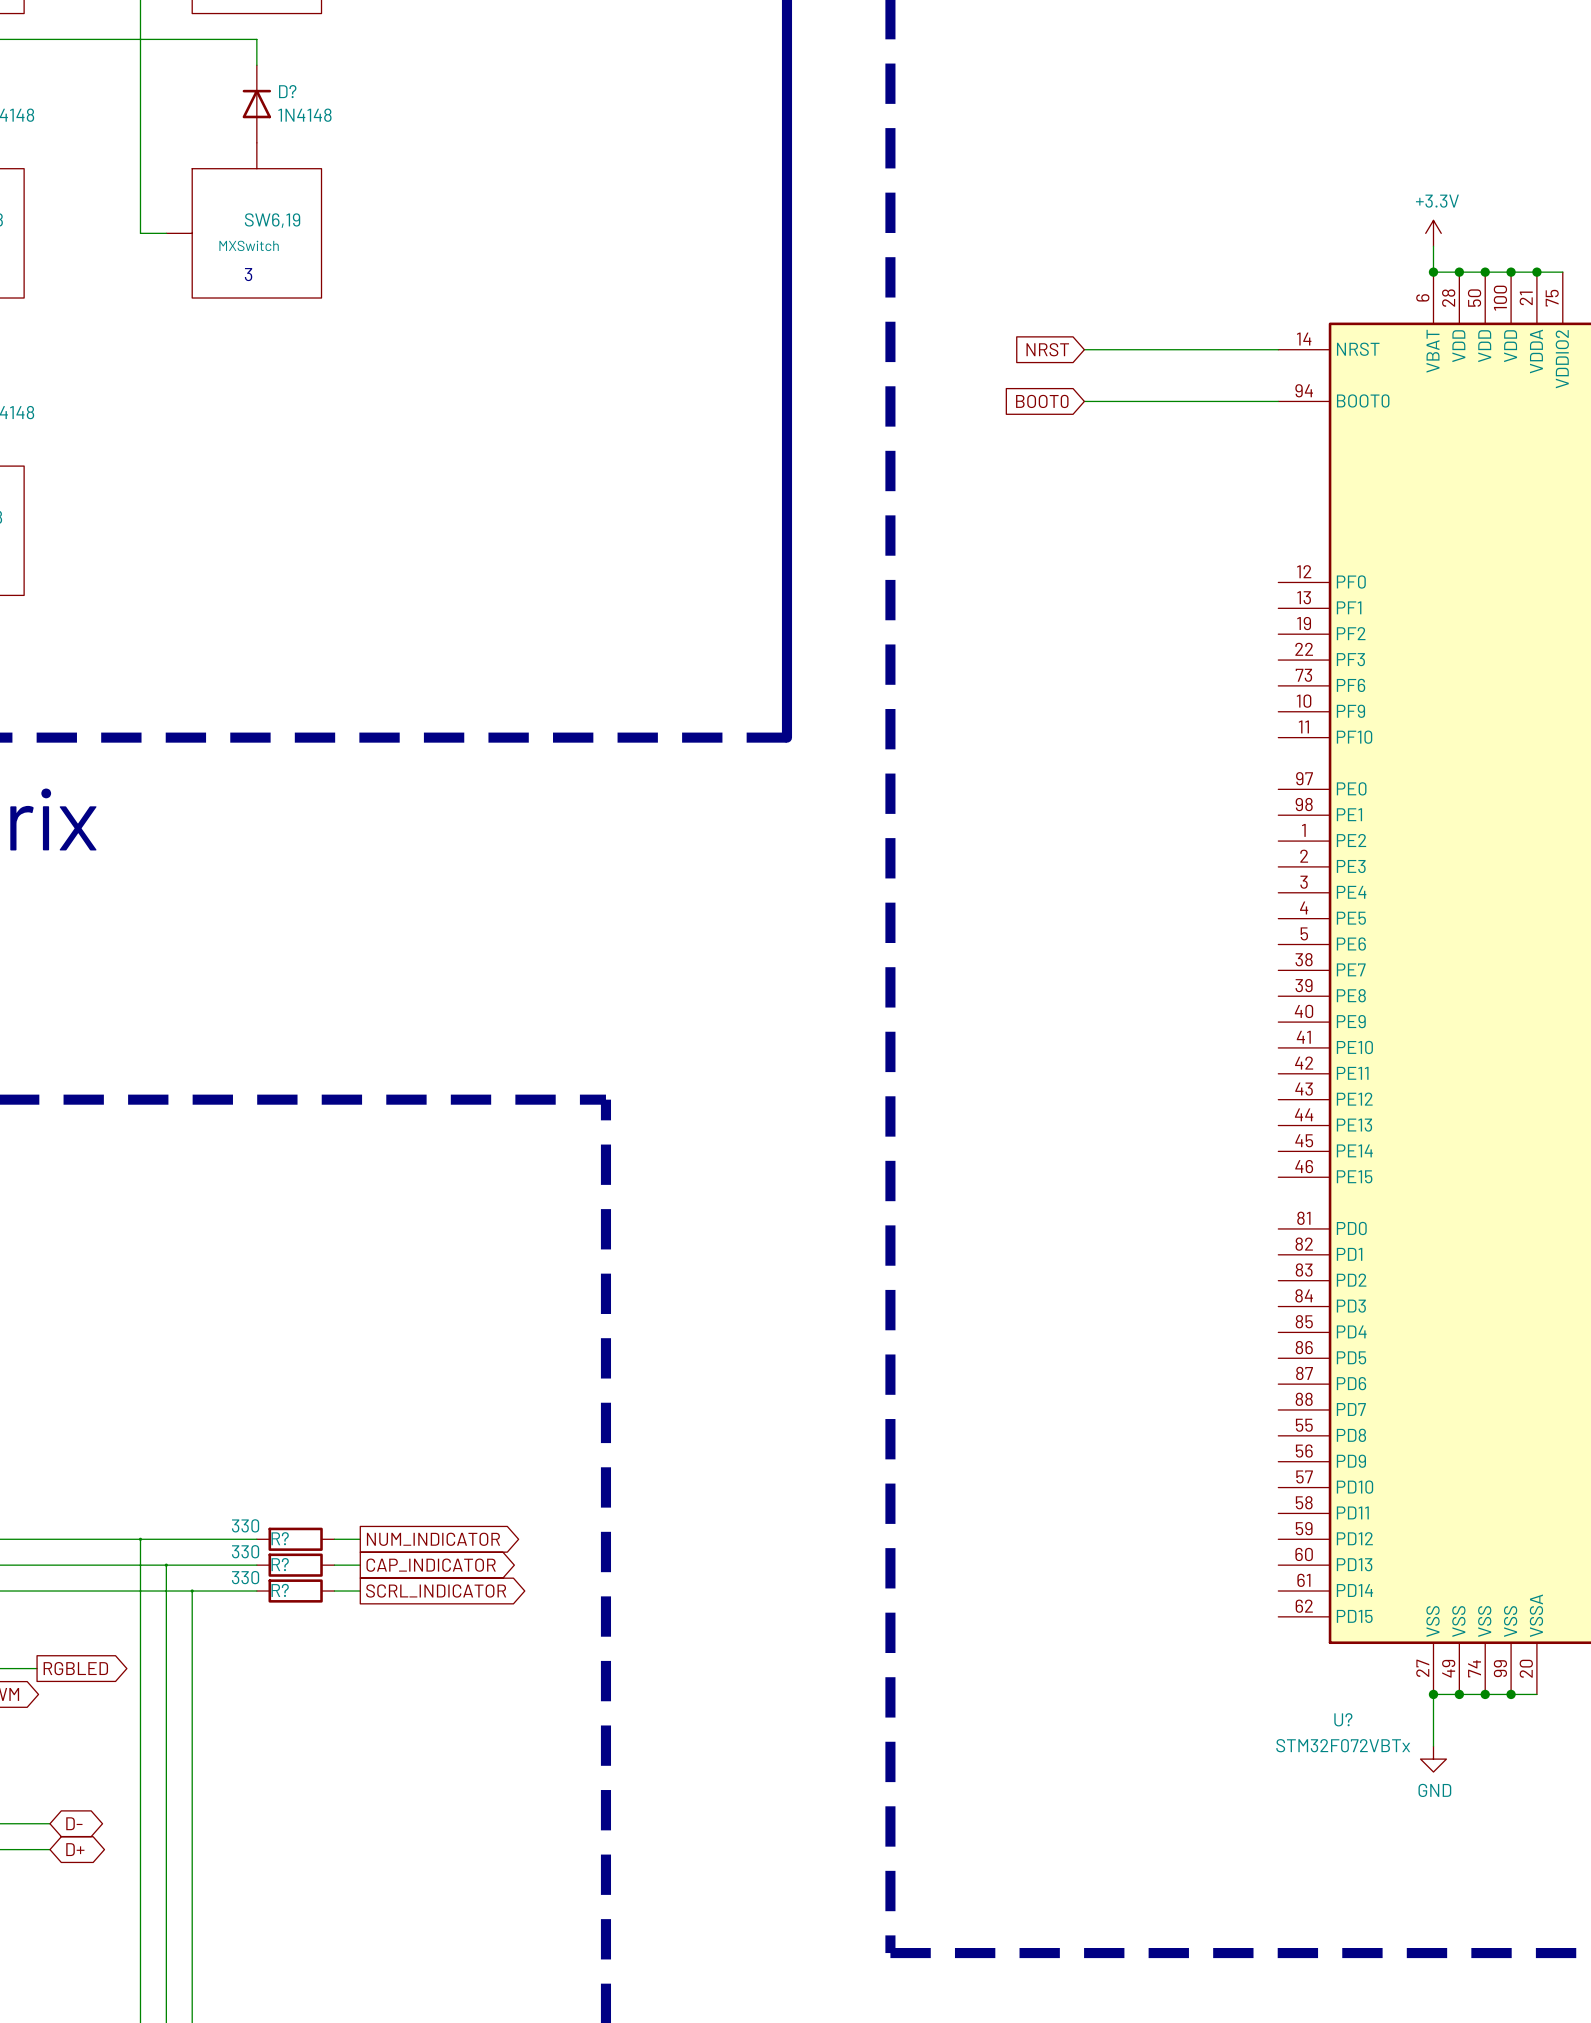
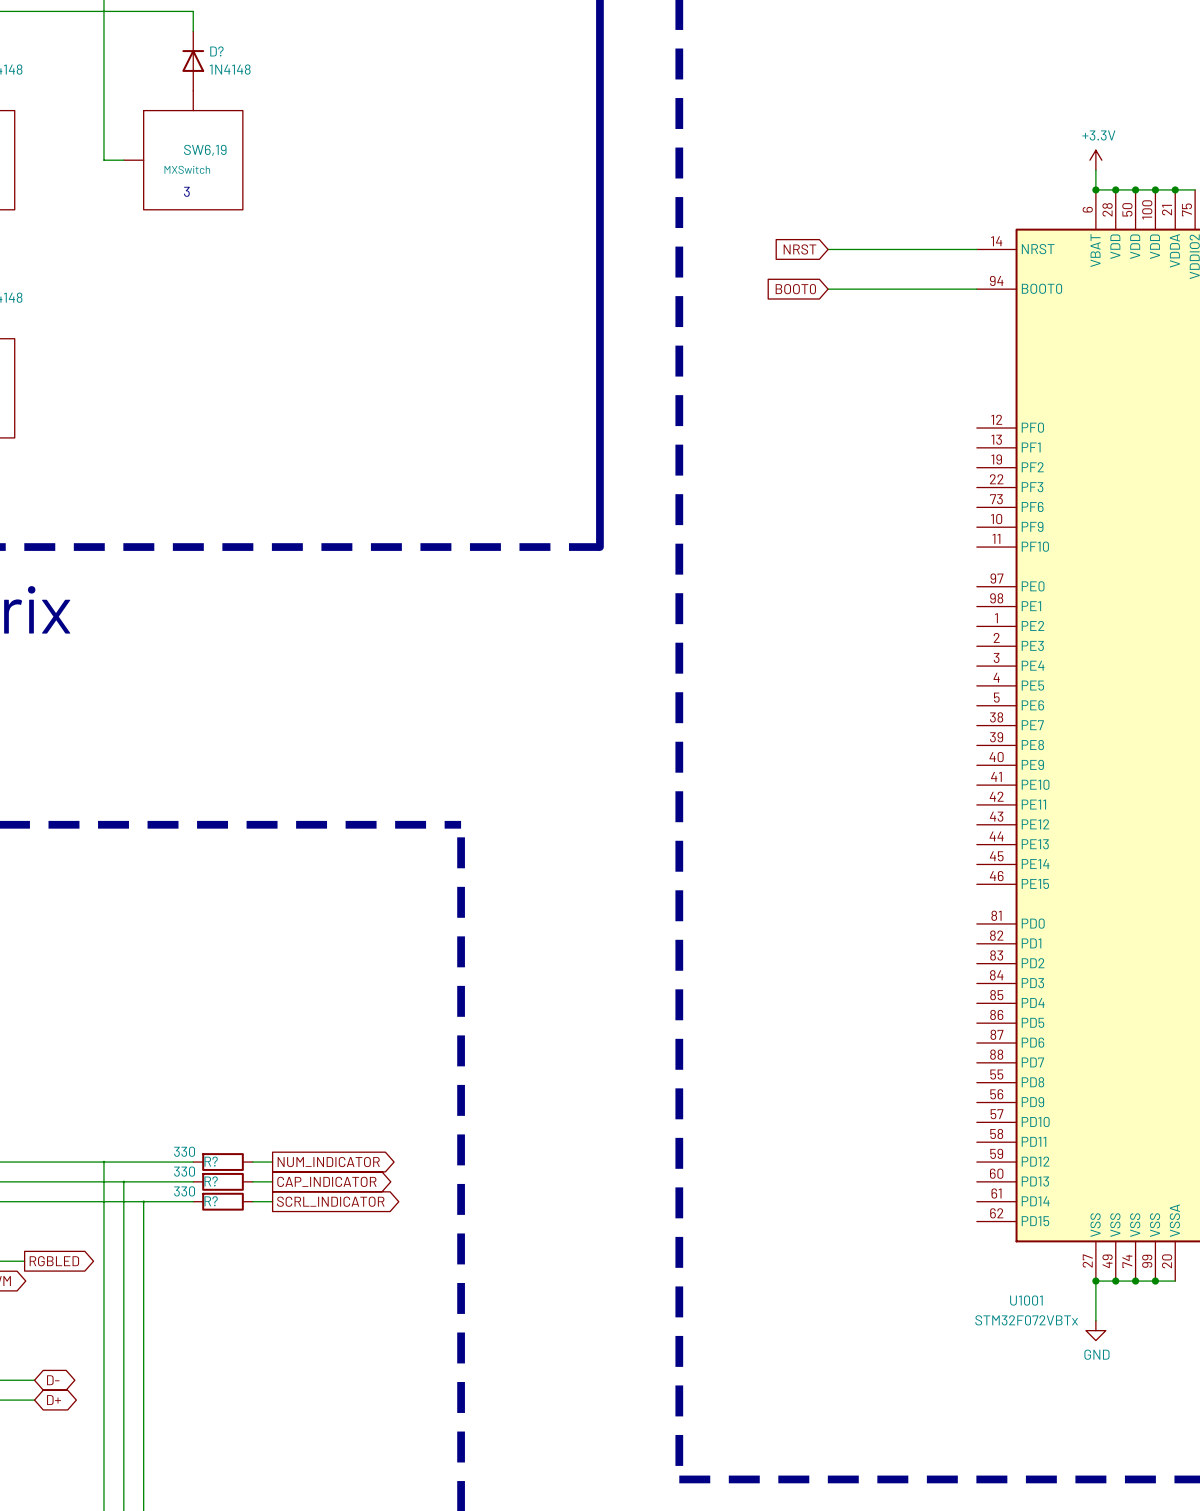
U? name: U? (1343, 1719) -> U1001 (1026, 1300)

